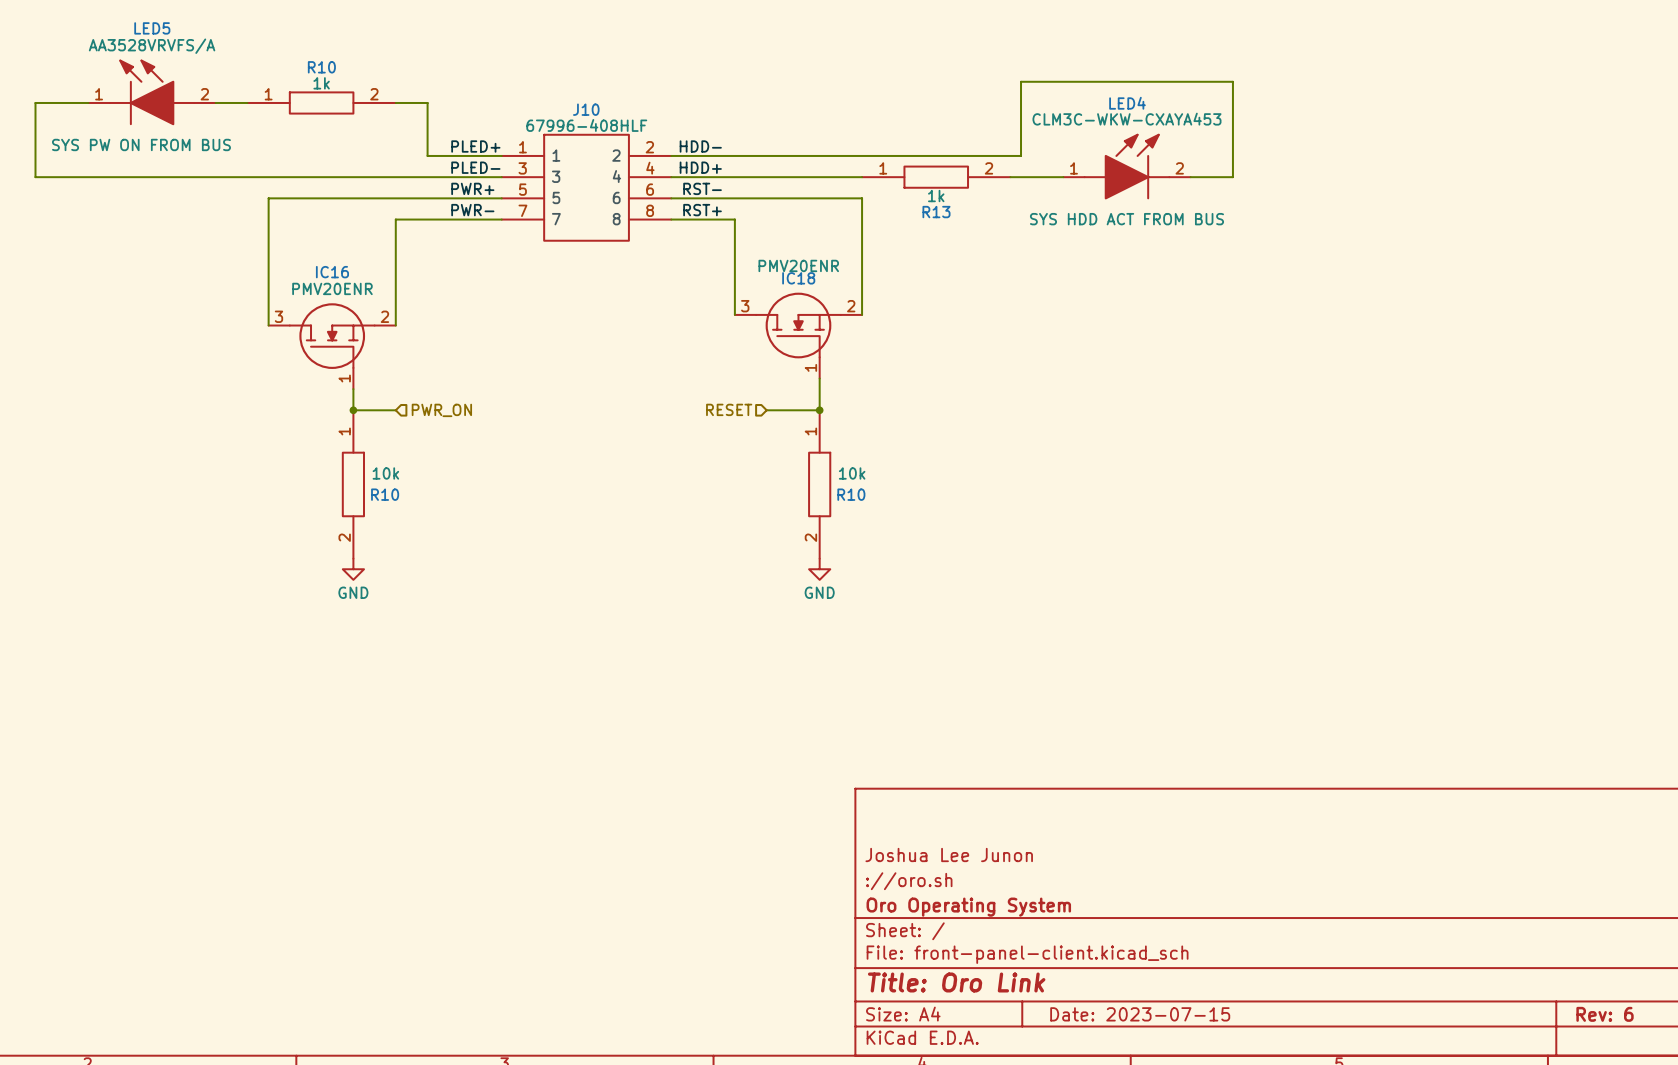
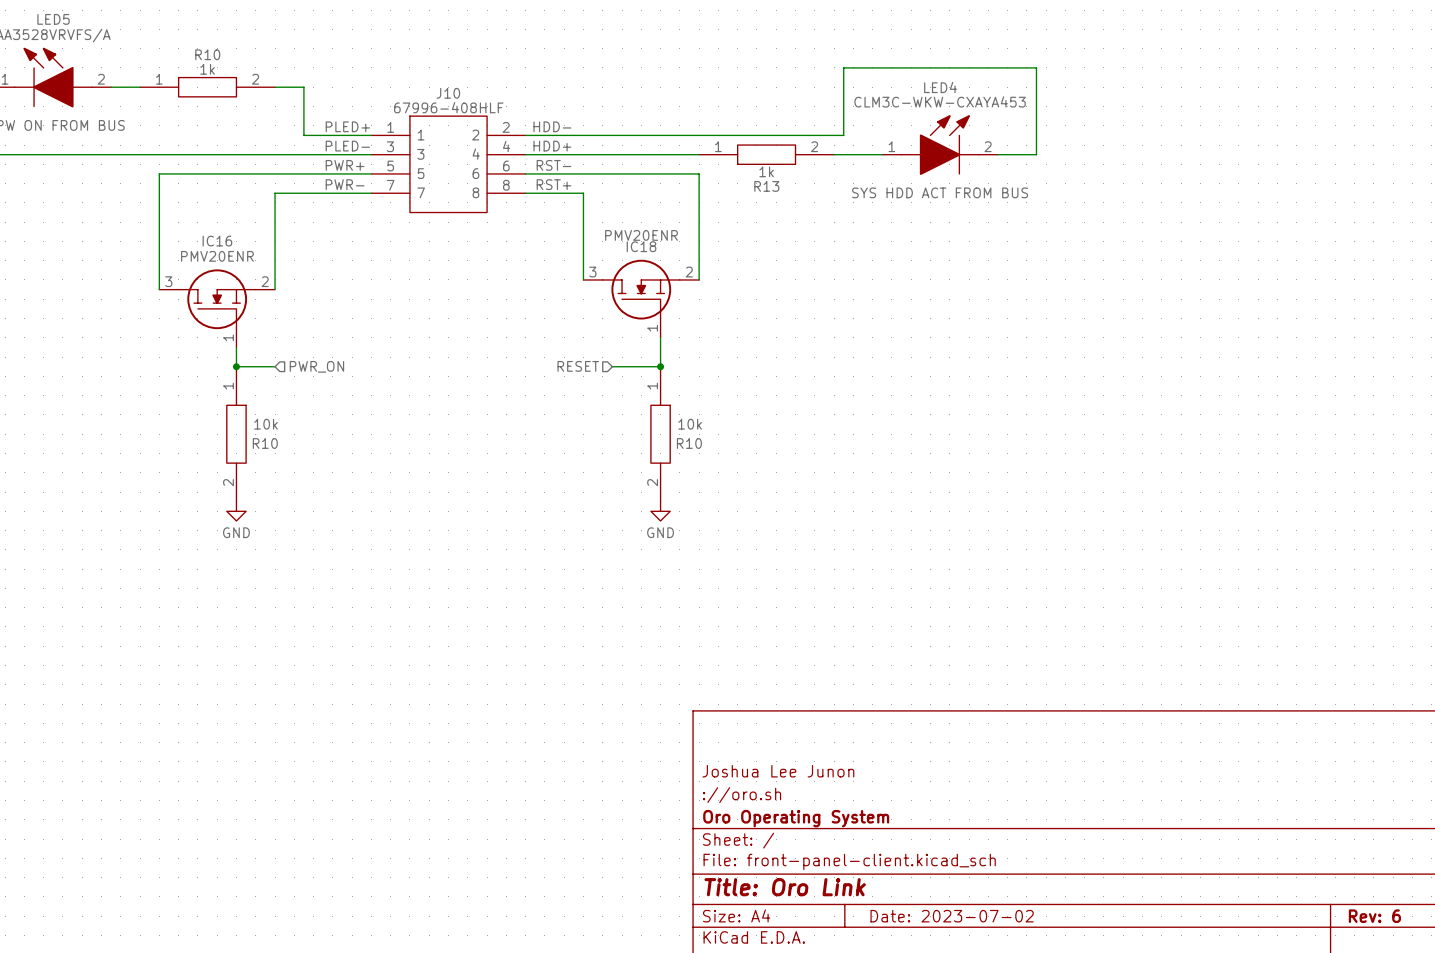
title block: Date: 2023-07-15 (1140, 1014) -> Date: 2023-07-02 (952, 916)

